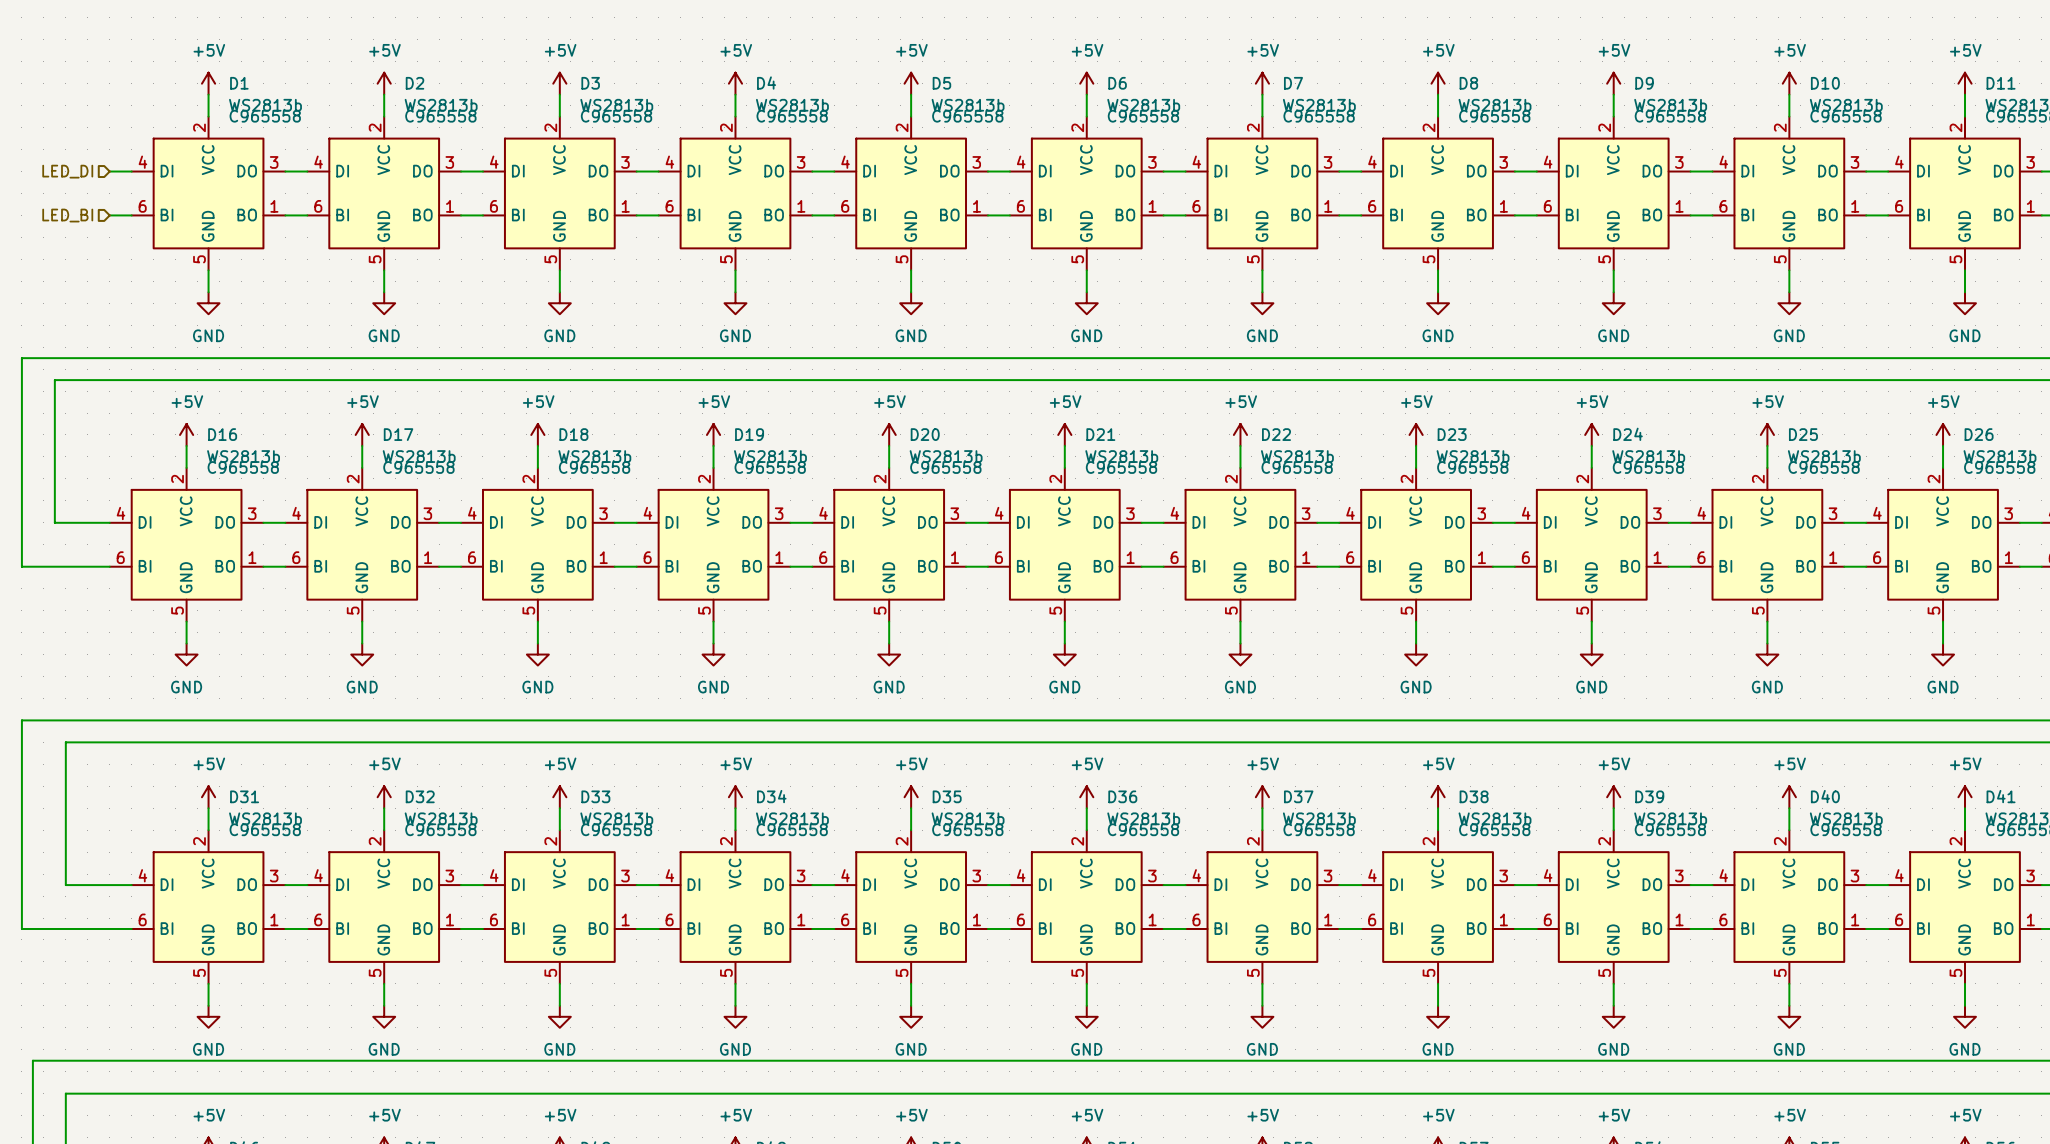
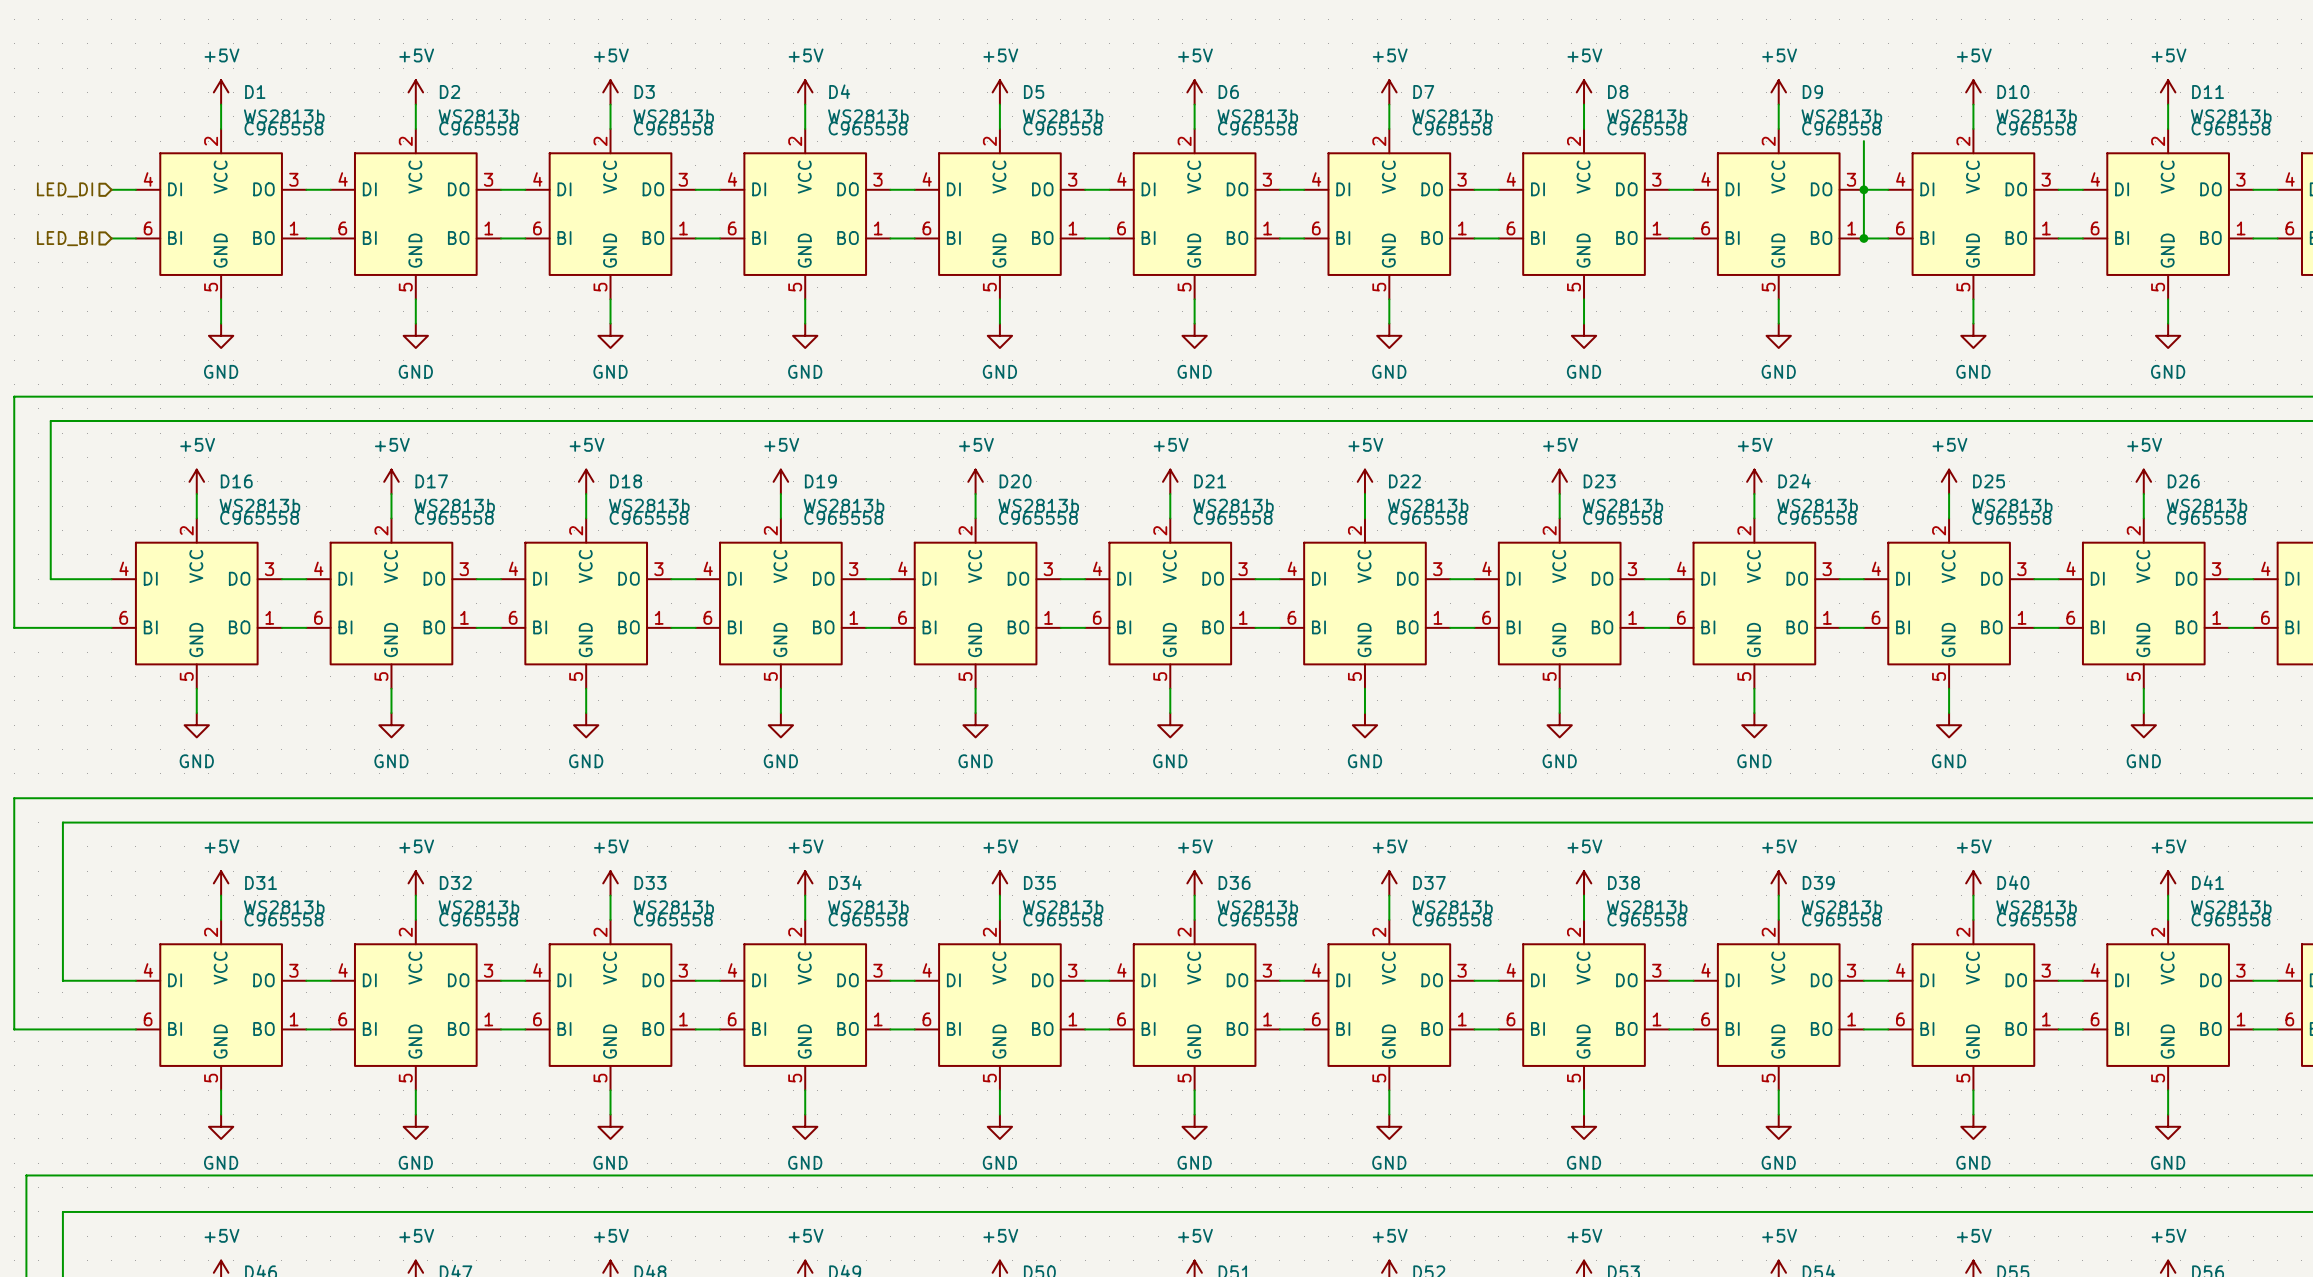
wire: none -> (1863, 141) (1863, 238)
junction: none -> (1863, 189)
junction: none -> (1863, 238)

